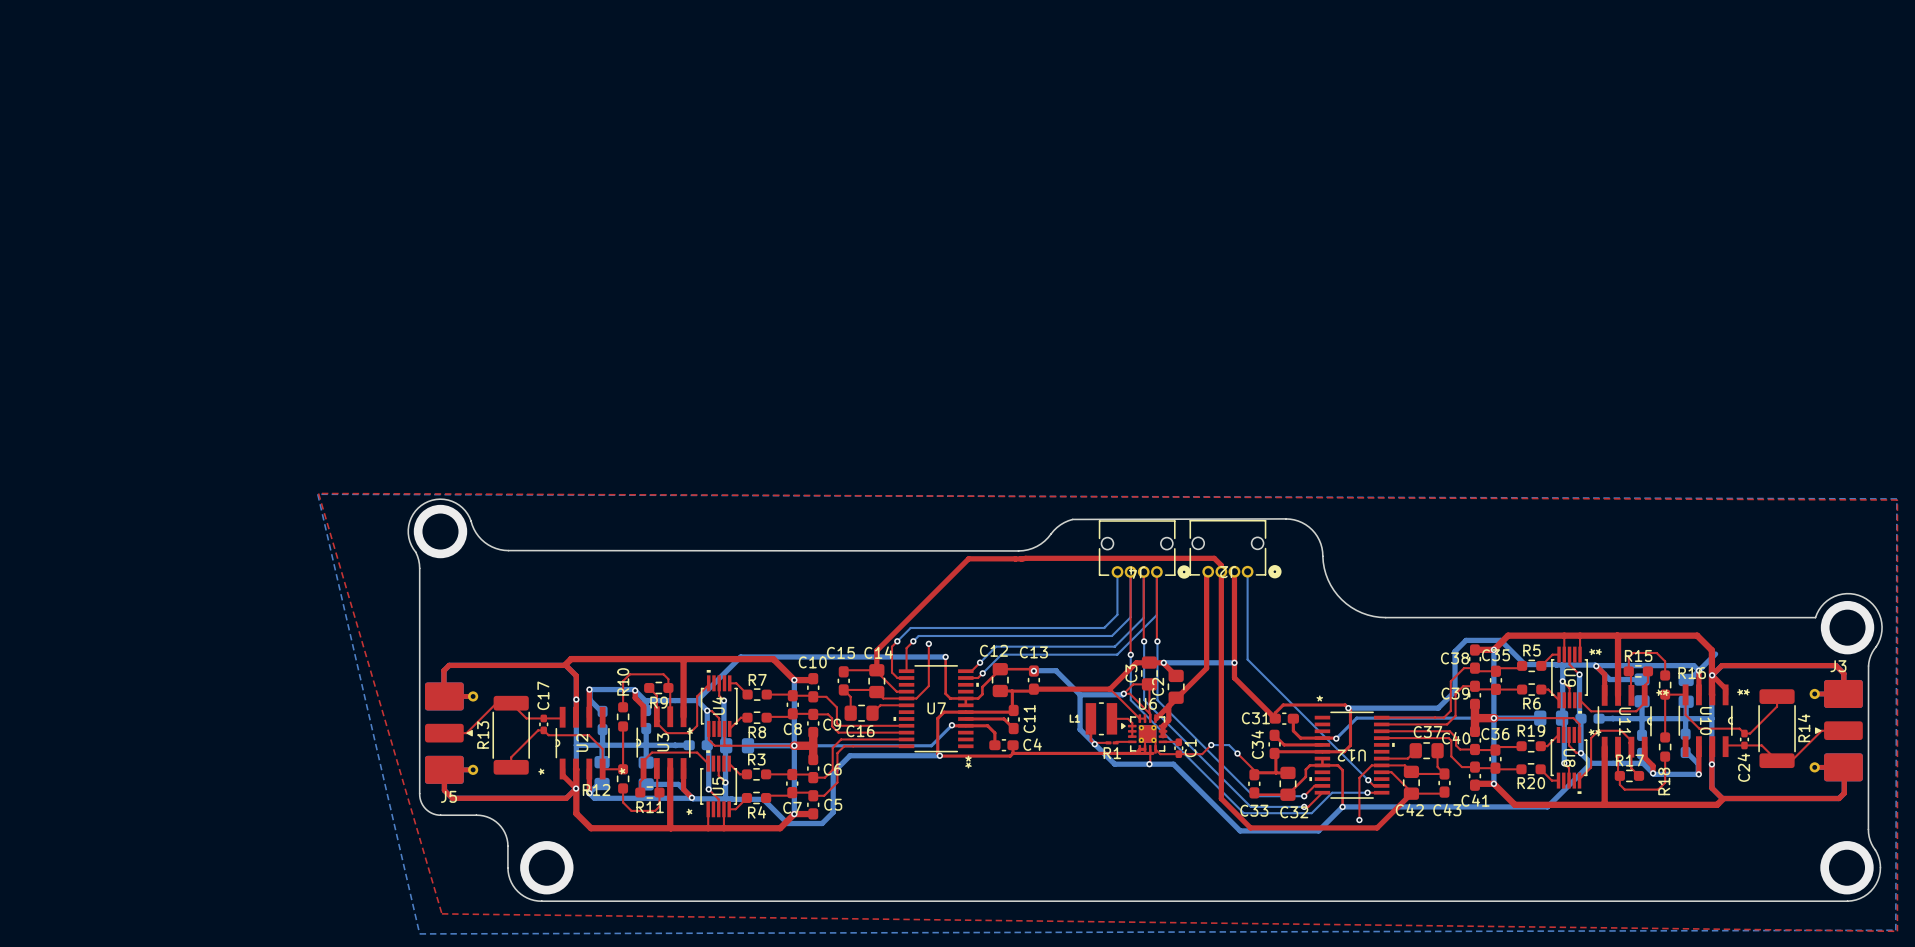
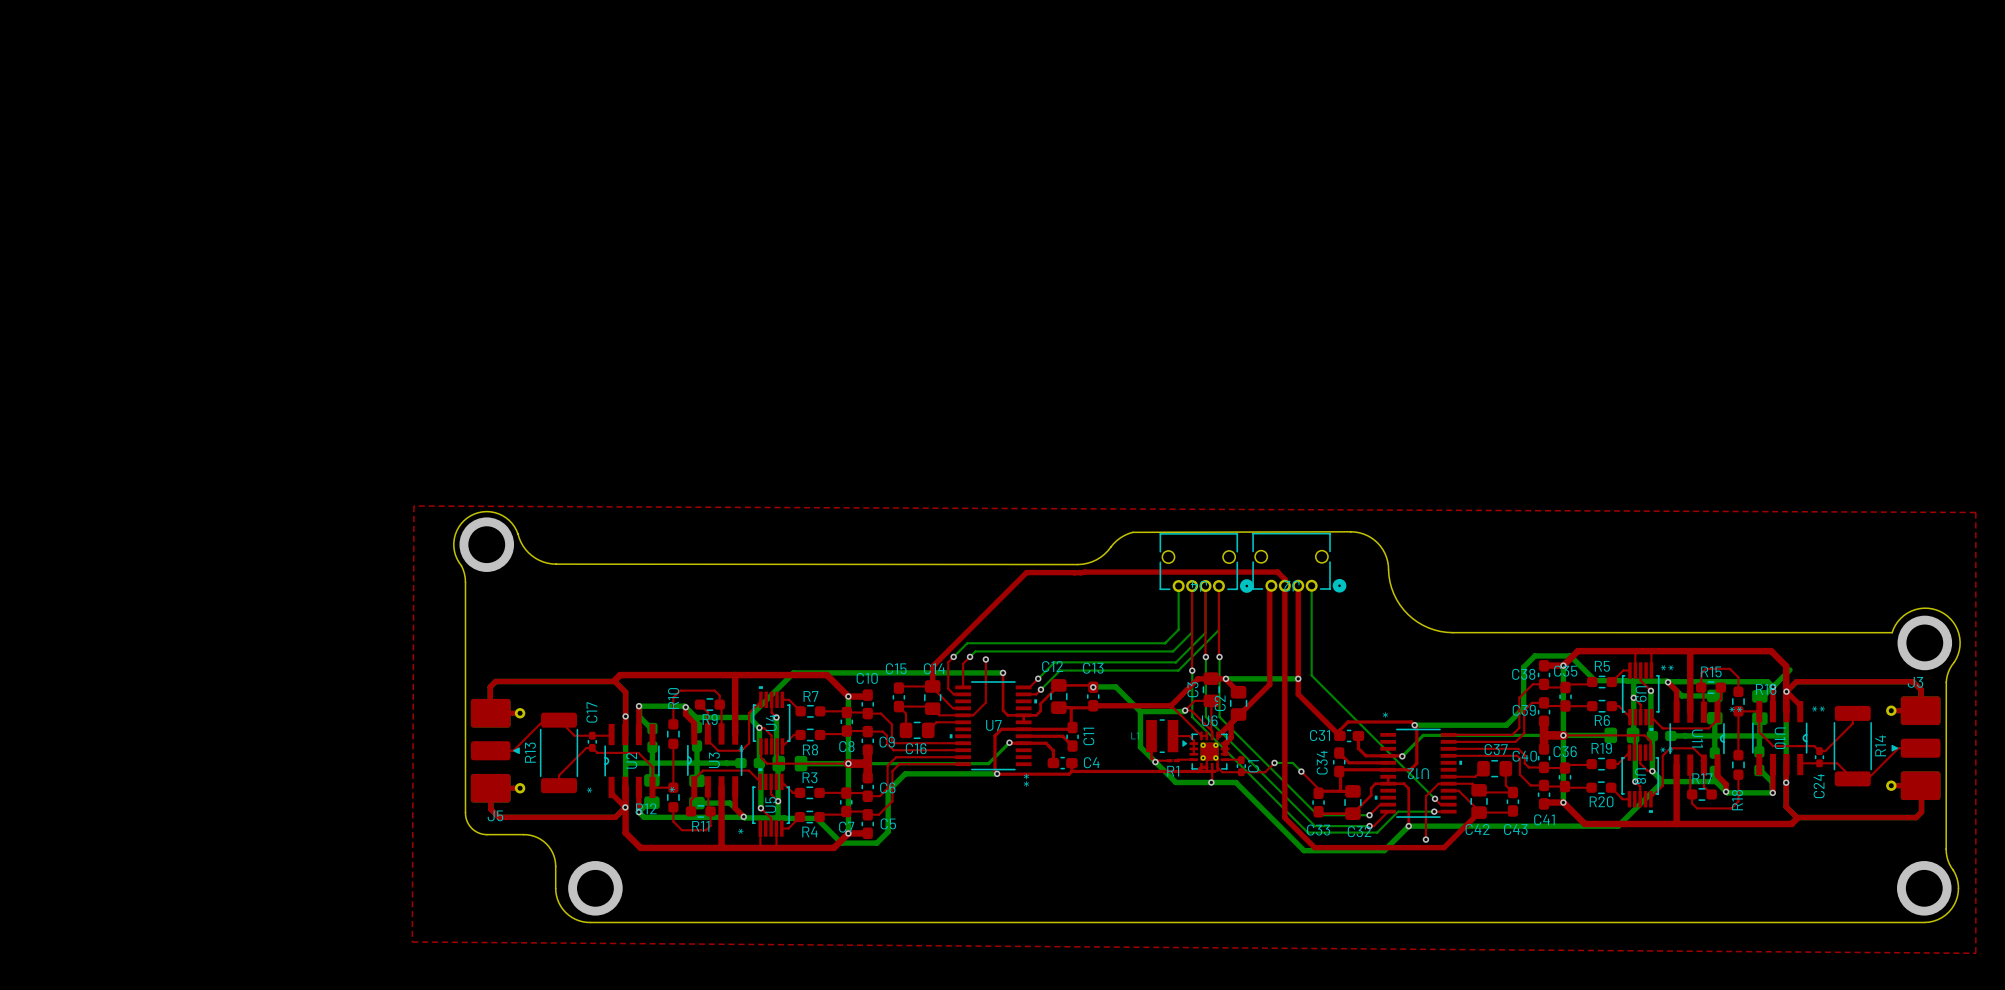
top zone outline: (369, 493) (318, 493) (441, 913) (1897, 931) -> (413, 506) (412, 942) (1975, 953)
bottom zone outline: (317, 494) (1896, 498) (1895, 930) (419, 933) (317, 494) -> none

